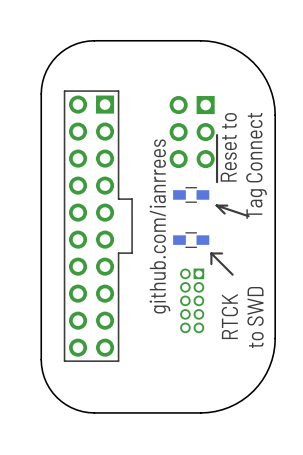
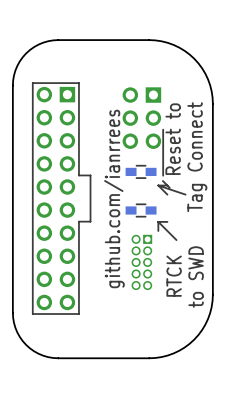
line: (227, 205) (216, 205) (248, 216) -> none
line: none -> (158, 185) (167, 194)
line: none -> (158, 185) (185, 194)
line: none -> (167, 185) (158, 185)

